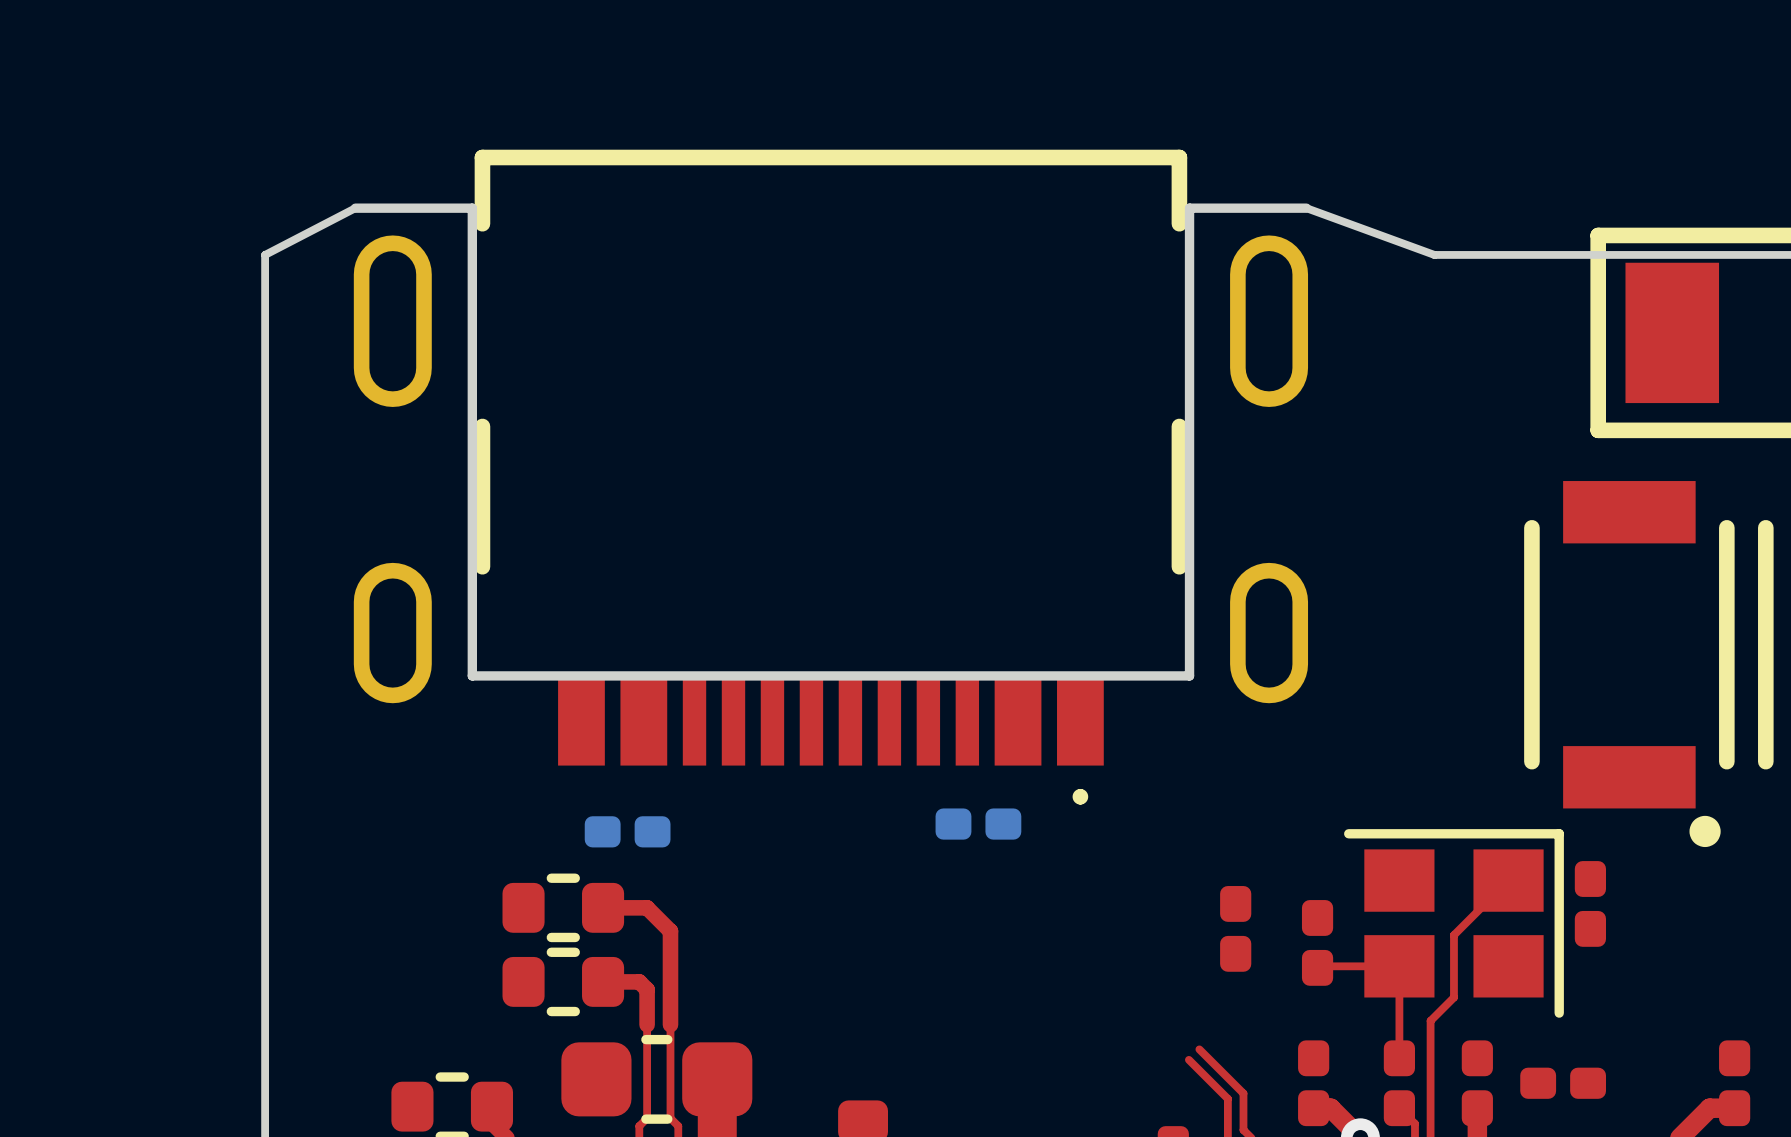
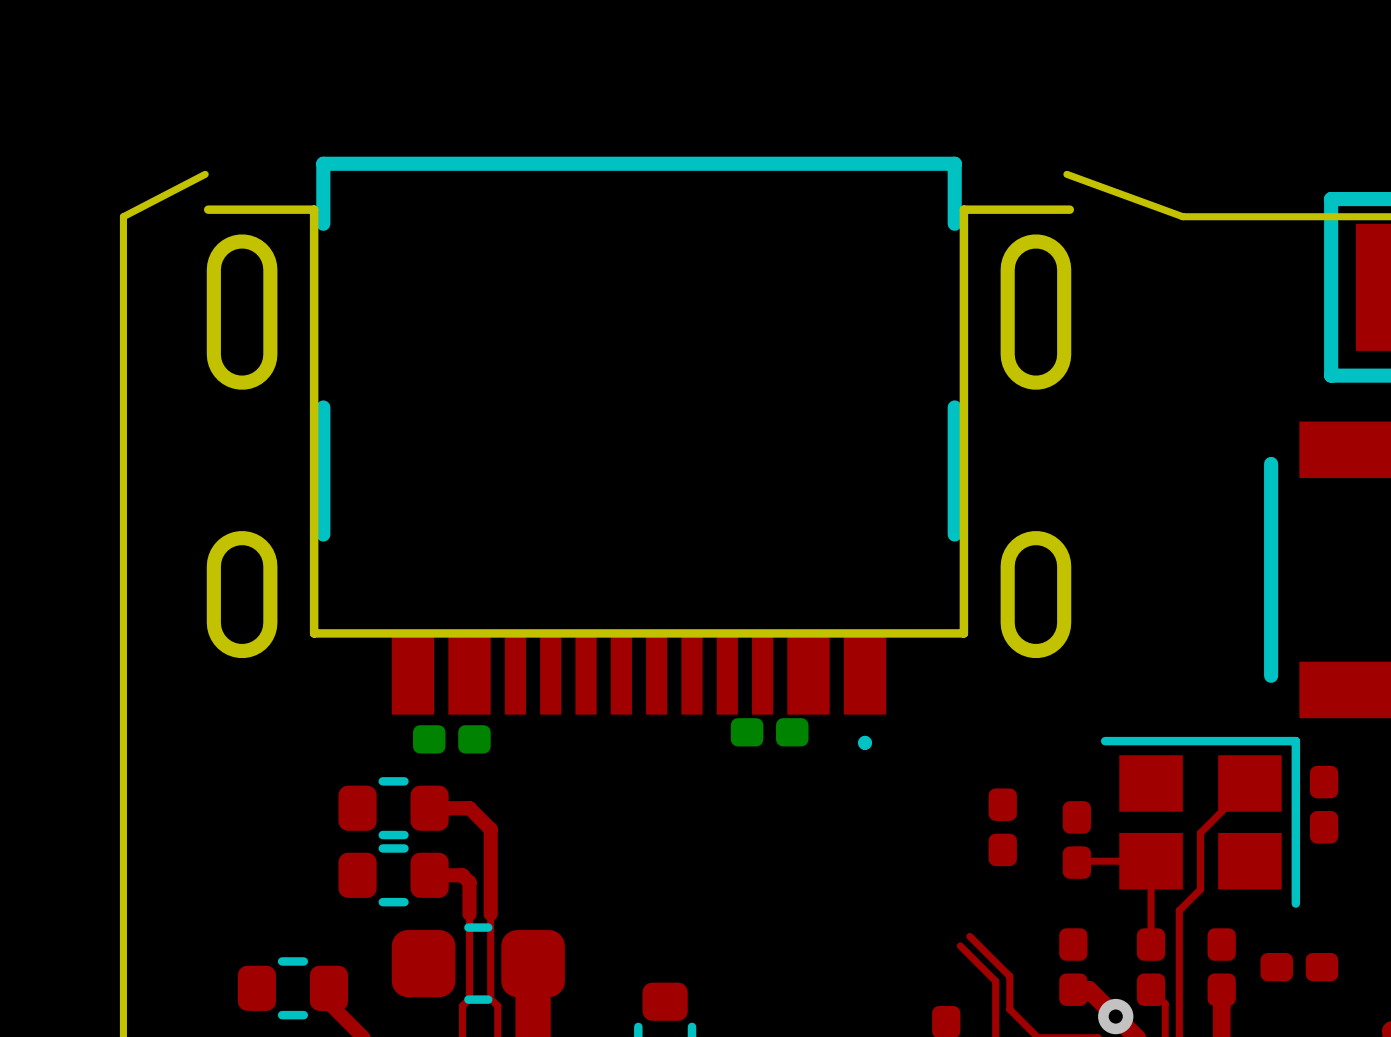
part position: (830, 477) -> (639, 453)

